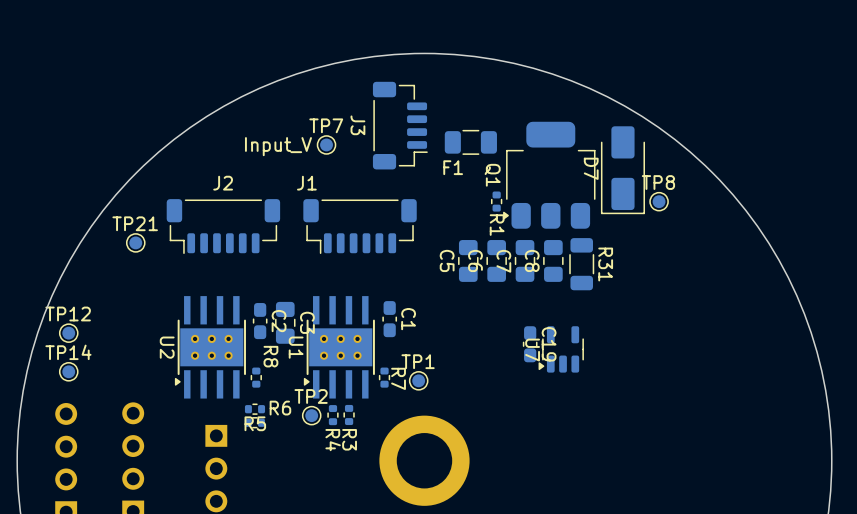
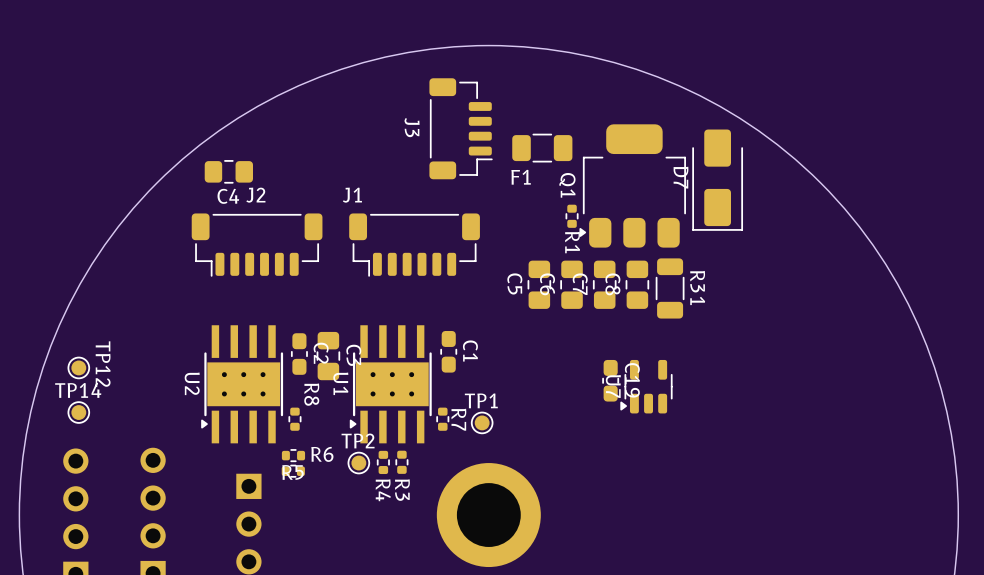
TP7: (326, 144) -> none
text: Input_V (278, 146) -> none
C4: none -> (228, 171)
TP8: (659, 201) -> none
TP21: (135, 242) -> none
TP12 name rotation: 0° (68, 314) -> 90° clockwise (103, 364)

